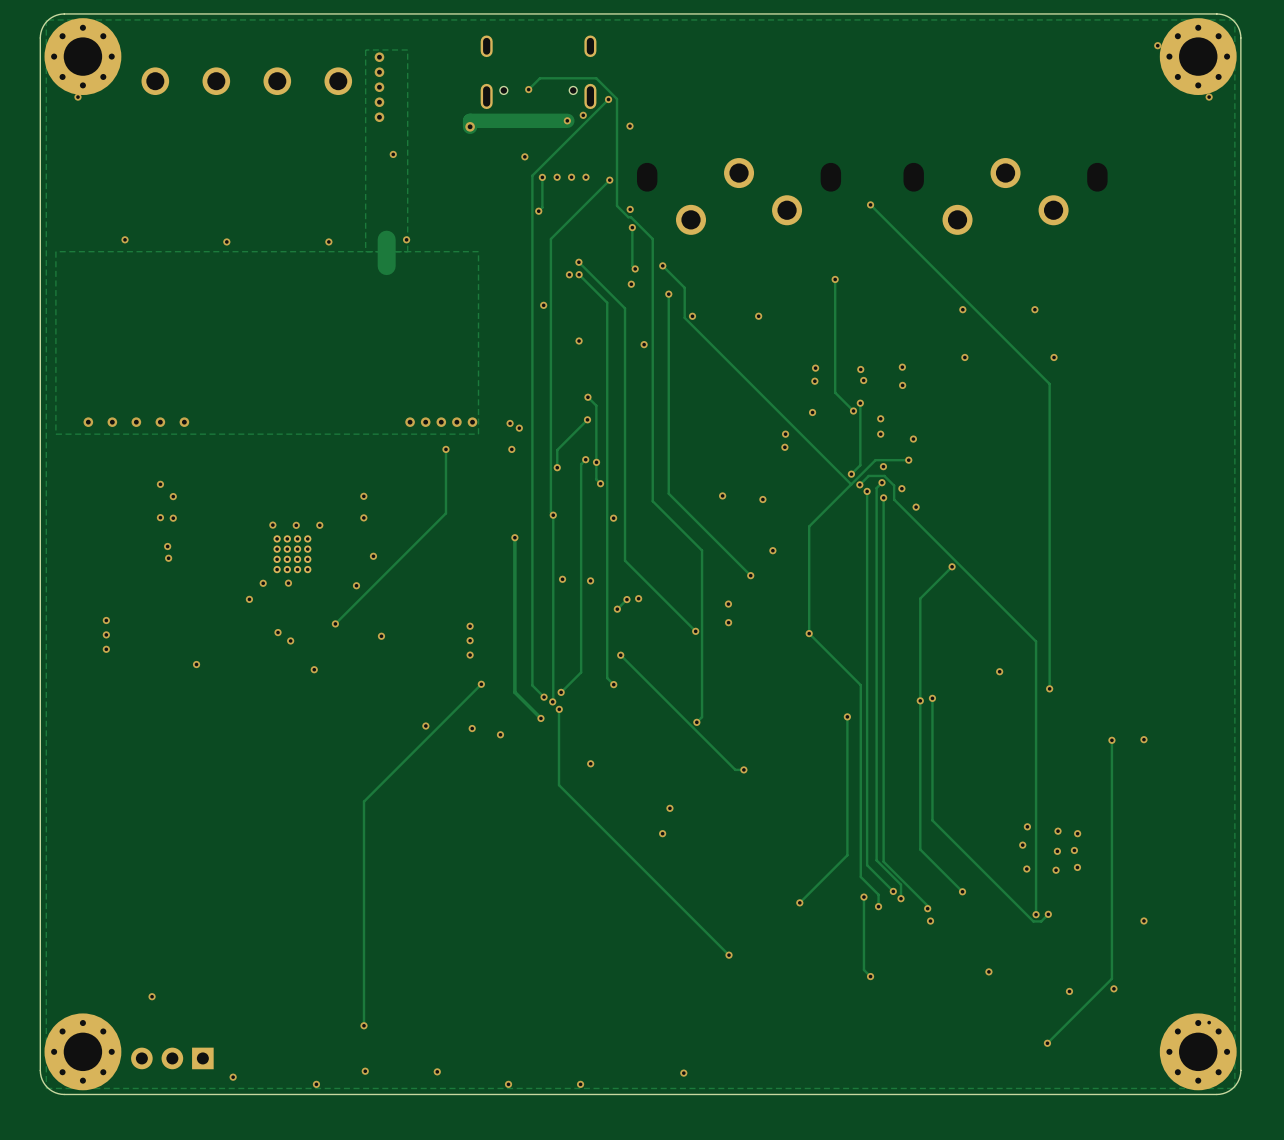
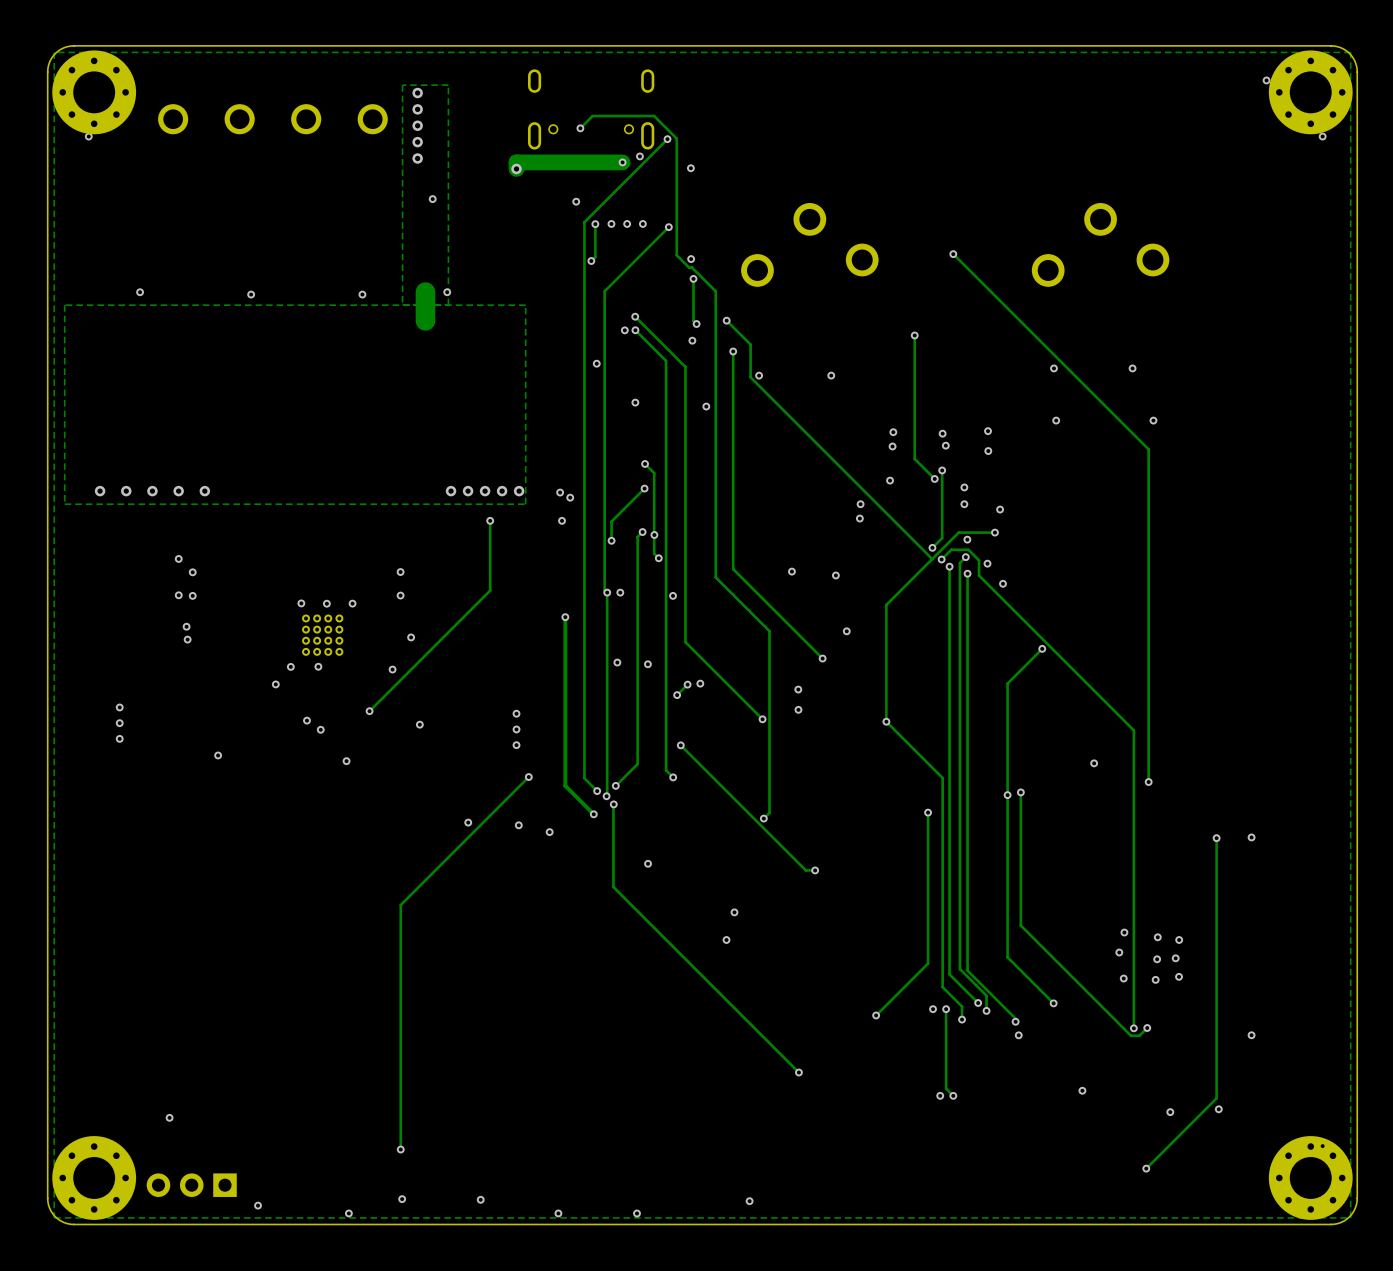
via: none -> (620, 592)
via: none -> (933, 1009)
via: none -> (940, 1095)

